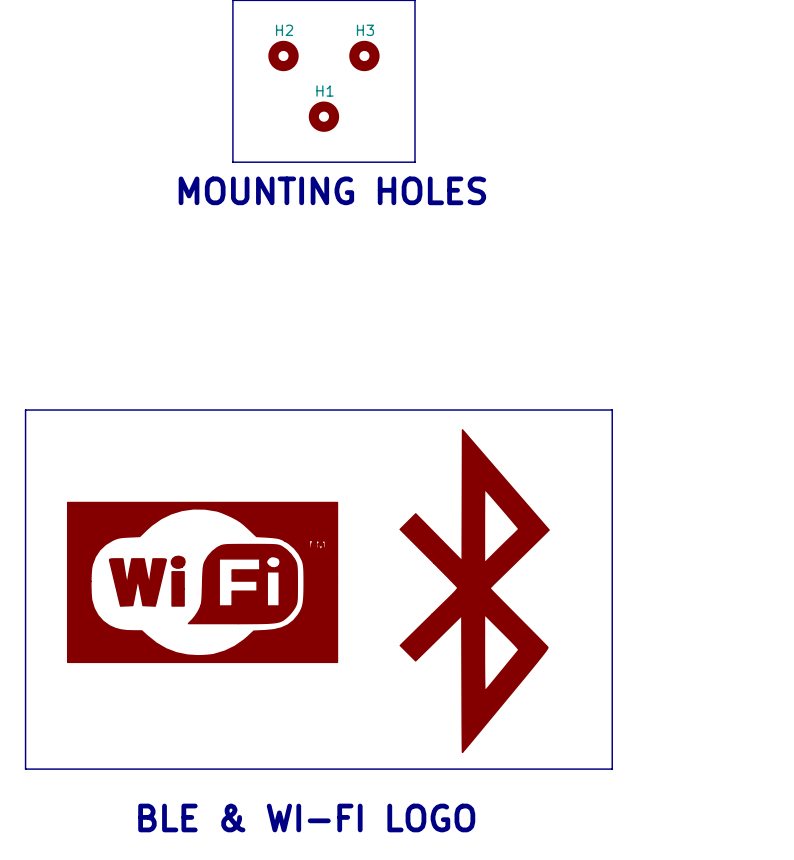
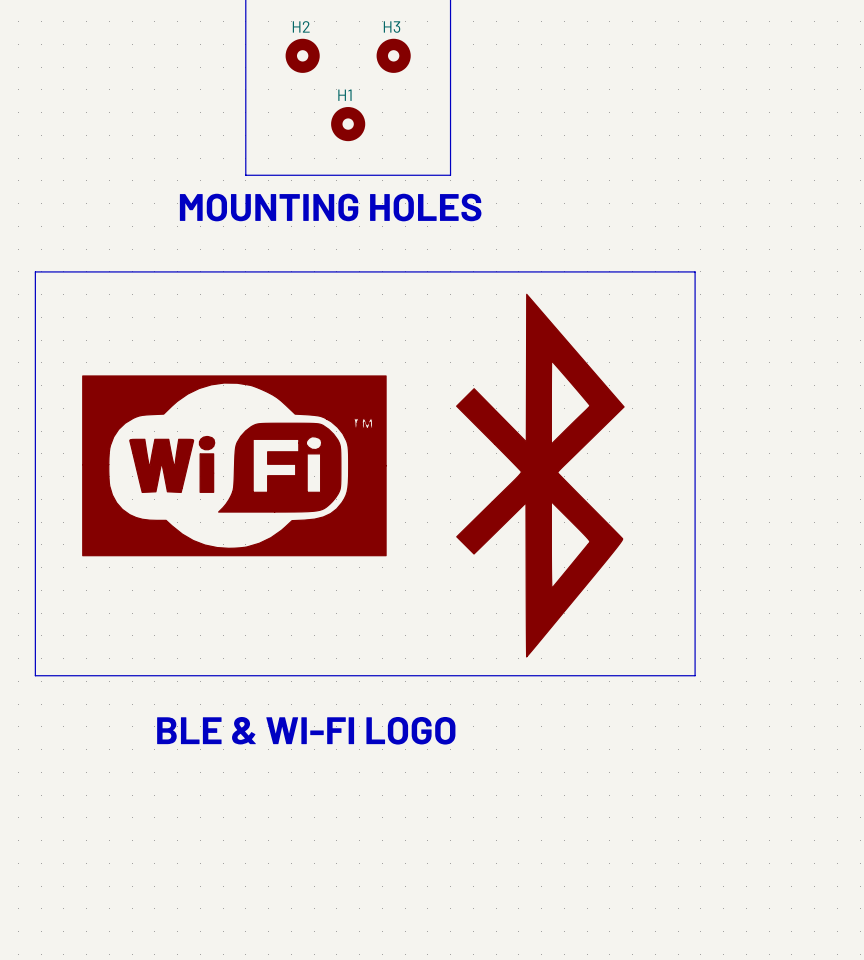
bus: (25, 410) (25, 769) (612, 769) (612, 410) (25, 410) -> (35, 271) (35, 675) (695, 675) (695, 271) (35, 271)
power symbol position: (202, 582) -> (234, 465)
power symbol position: (474, 591) -> (540, 475)
text position: BLE & WI-FI LOGO (306, 817) -> BLE & WI-FI LOGO (306, 730)

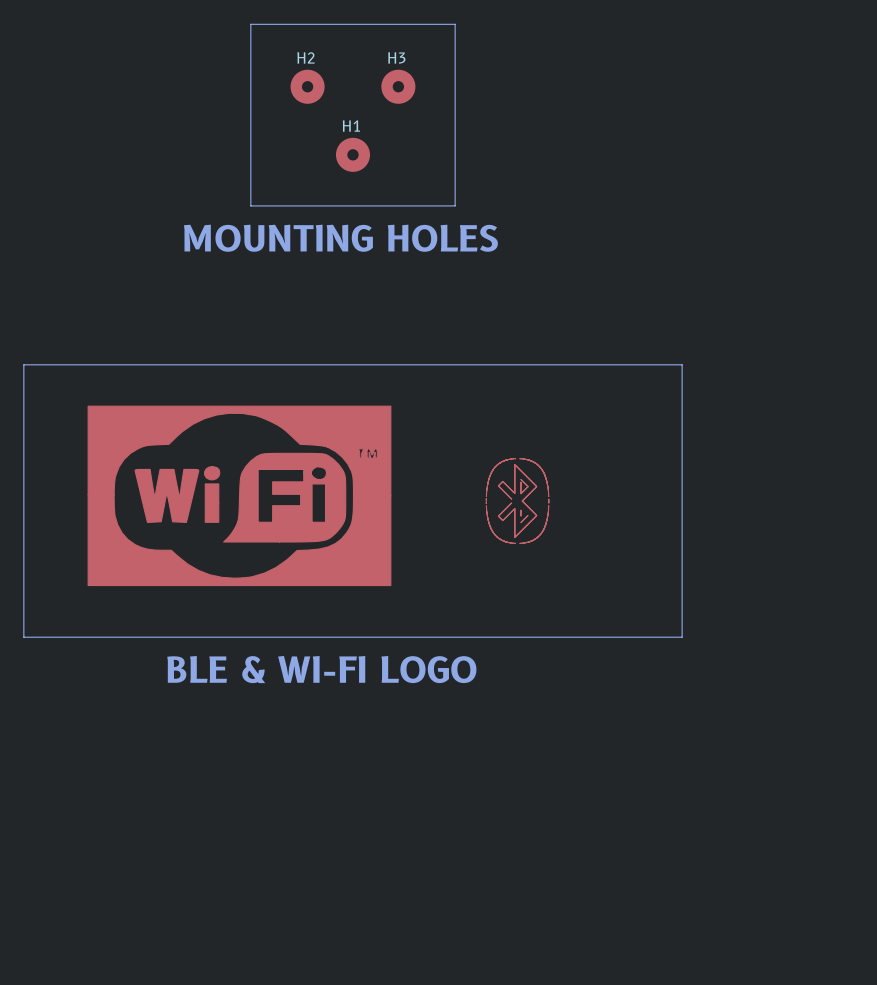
bus: (35, 271) (35, 675) (695, 675) (695, 271) (35, 271) -> (23, 364) (23, 637) (682, 637) (682, 364) (23, 364)
power symbol: none -> (517, 501)
power symbol: (540, 475) -> none
text position: BLE & WI-FI LOGO (306, 730) -> BLE & WI-FI LOGO (321, 669)

